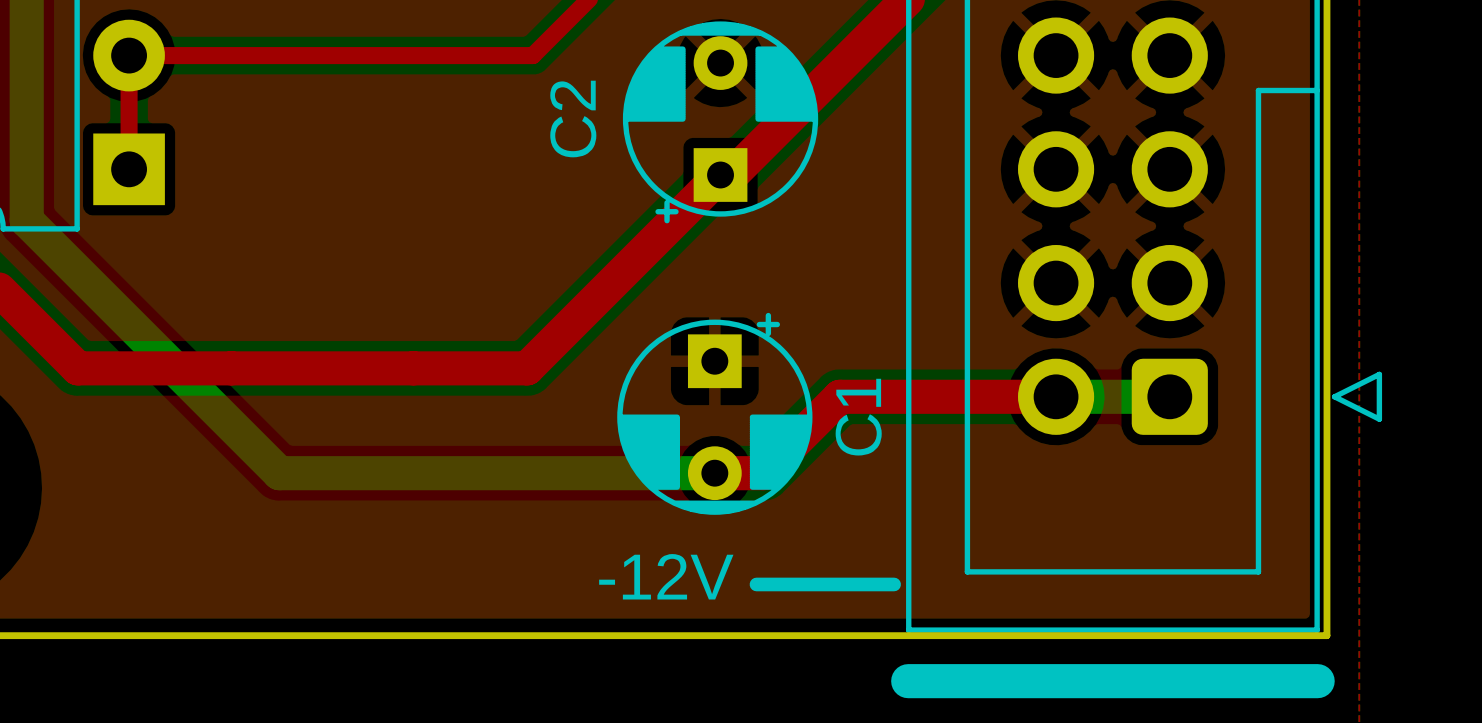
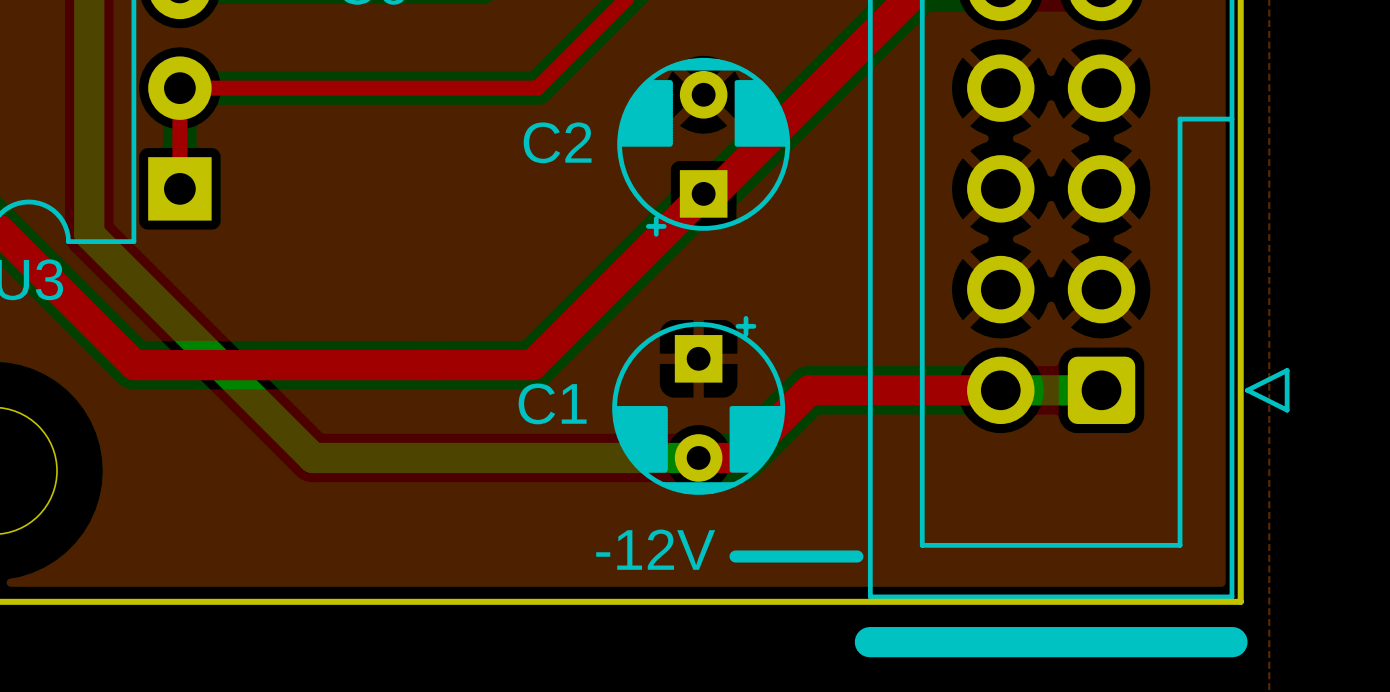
C2 name rotation: 0° (573, 119) -> 90° clockwise (557, 142)
C1 name rotation: 0° (858, 417) -> 90° clockwise (552, 403)
C1 name position: C1 (858, 417) -> C1 (552, 403)

